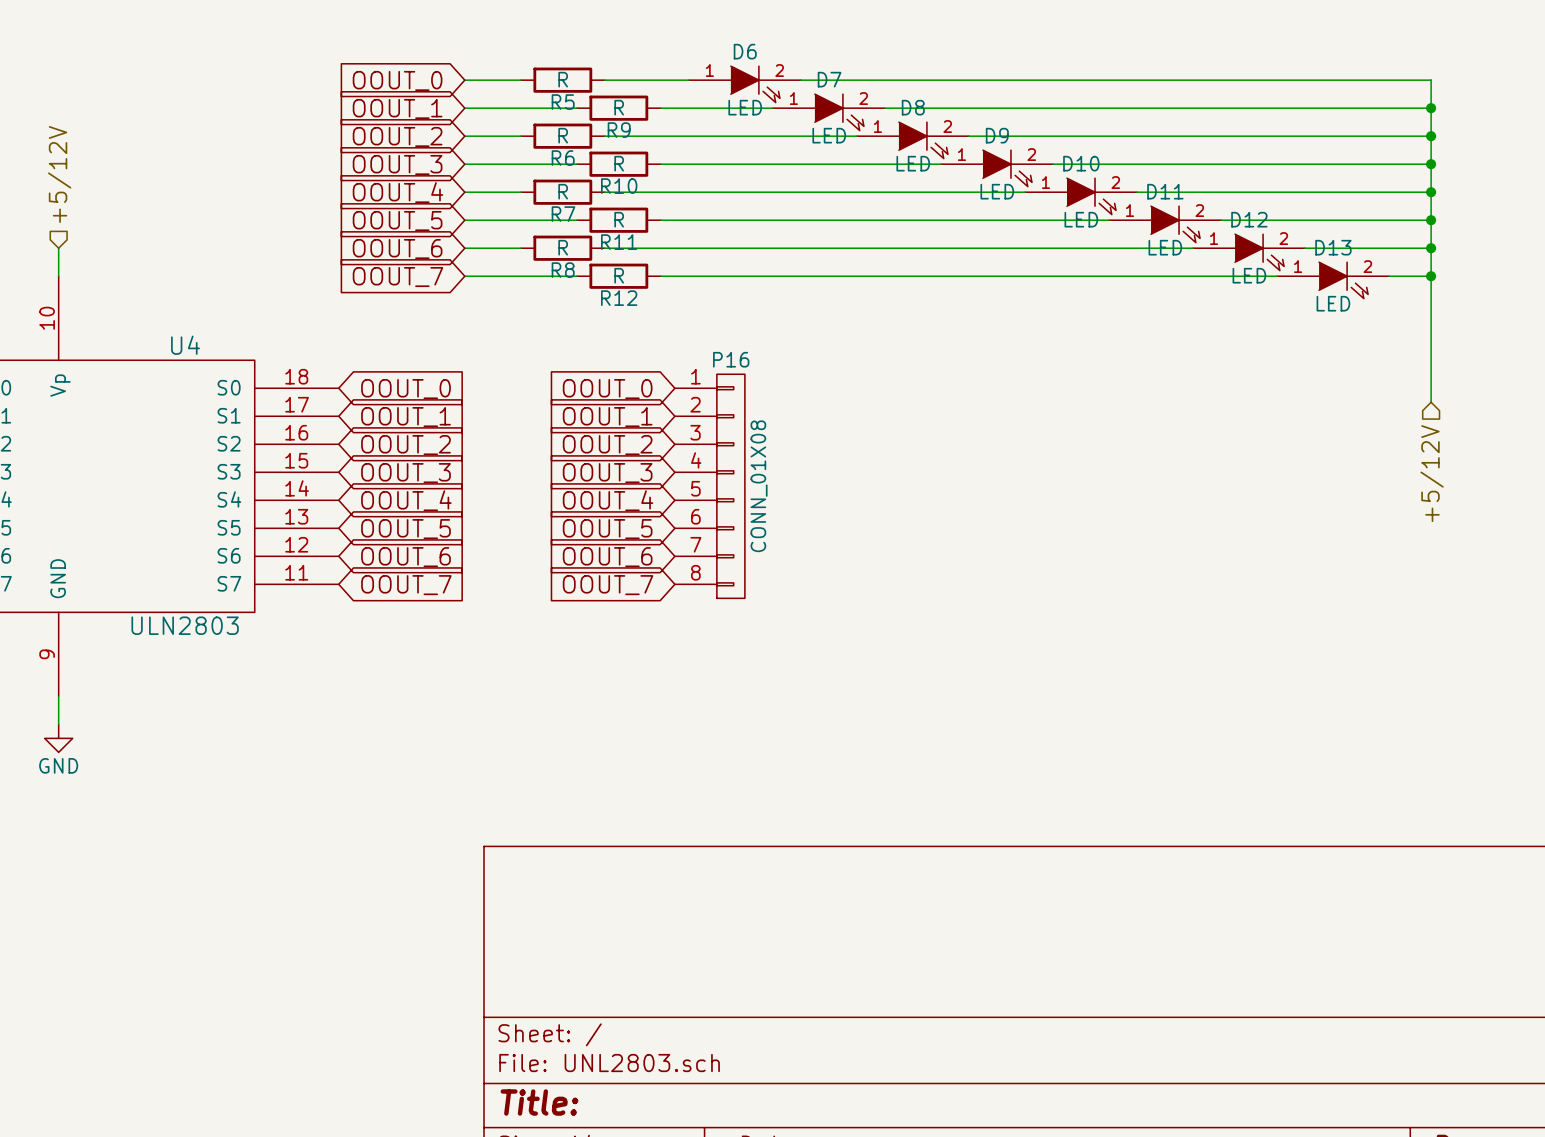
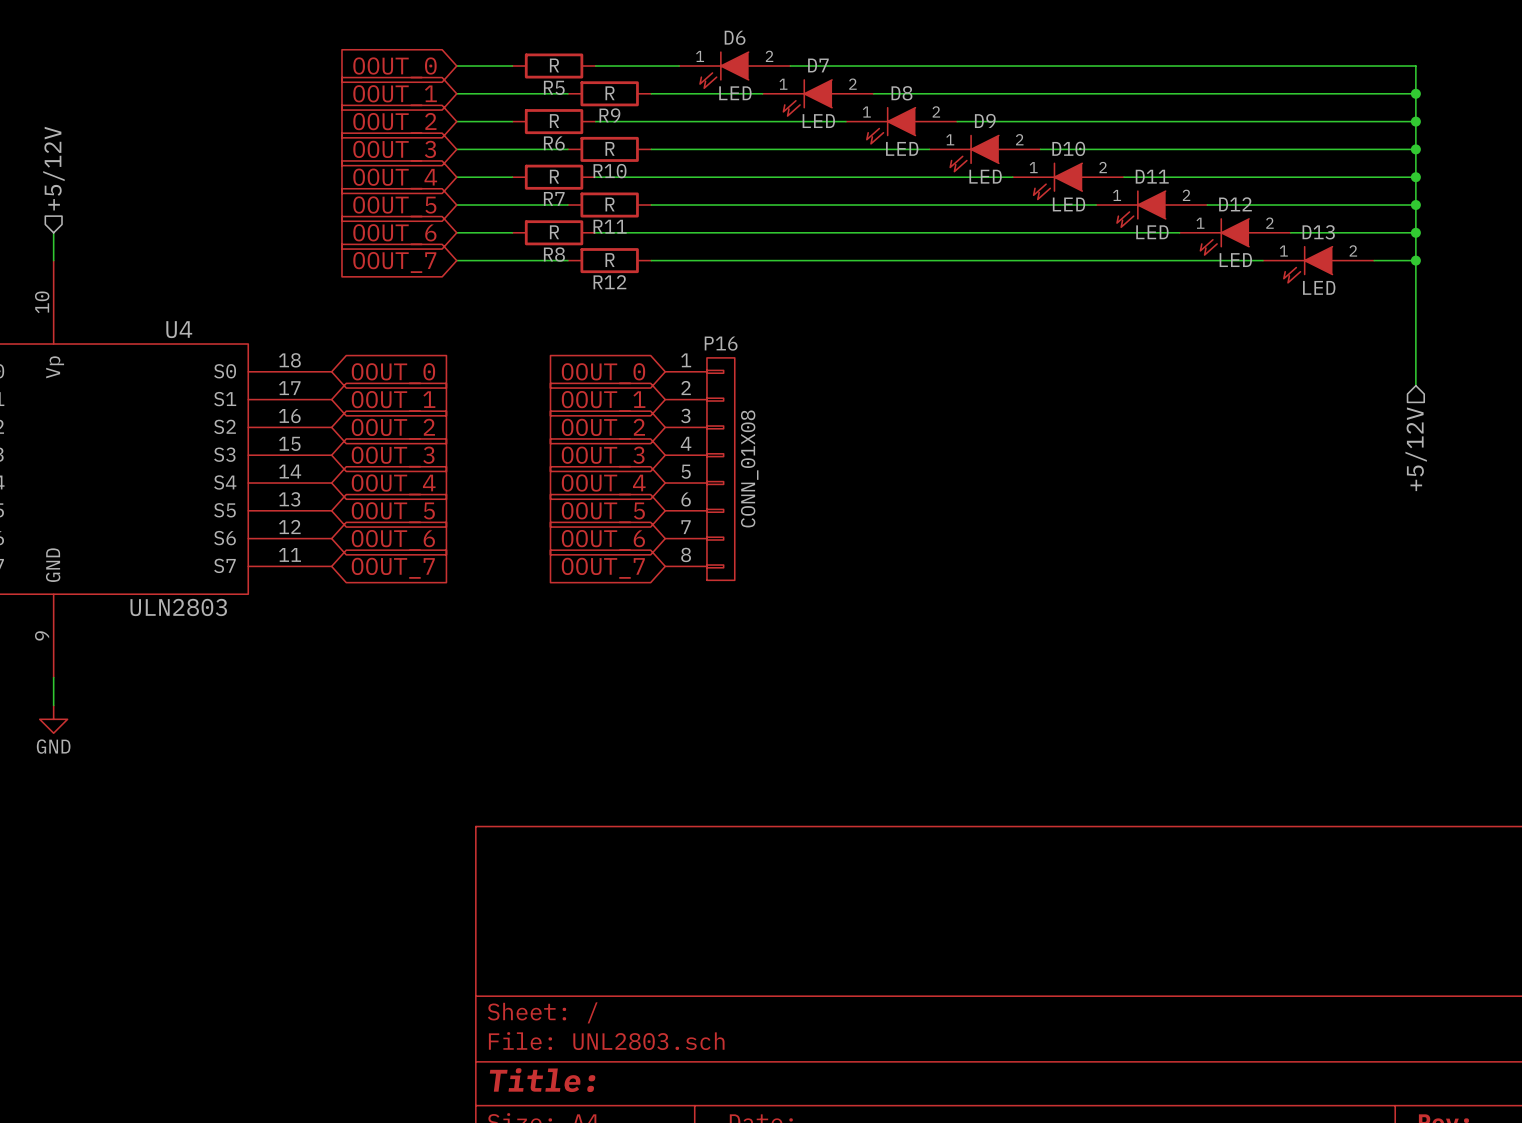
D6 symbol: [688, 66, 801, 103] -> [679, 52, 791, 89]
D7 symbol: [772, 94, 885, 131] -> [762, 79, 874, 117]
D8 symbol: [856, 122, 969, 159] -> [845, 107, 958, 144]
D9 symbol: [940, 150, 1053, 187] -> [929, 135, 1041, 172]
D10 symbol: [1024, 178, 1138, 215] -> [1012, 163, 1124, 200]
D11 symbol: [1109, 206, 1222, 243] -> [1096, 191, 1208, 228]
D12 symbol: [1193, 234, 1306, 271] -> [1179, 218, 1291, 256]
D13 symbol: [1277, 262, 1390, 299] -> [1262, 246, 1375, 283]

